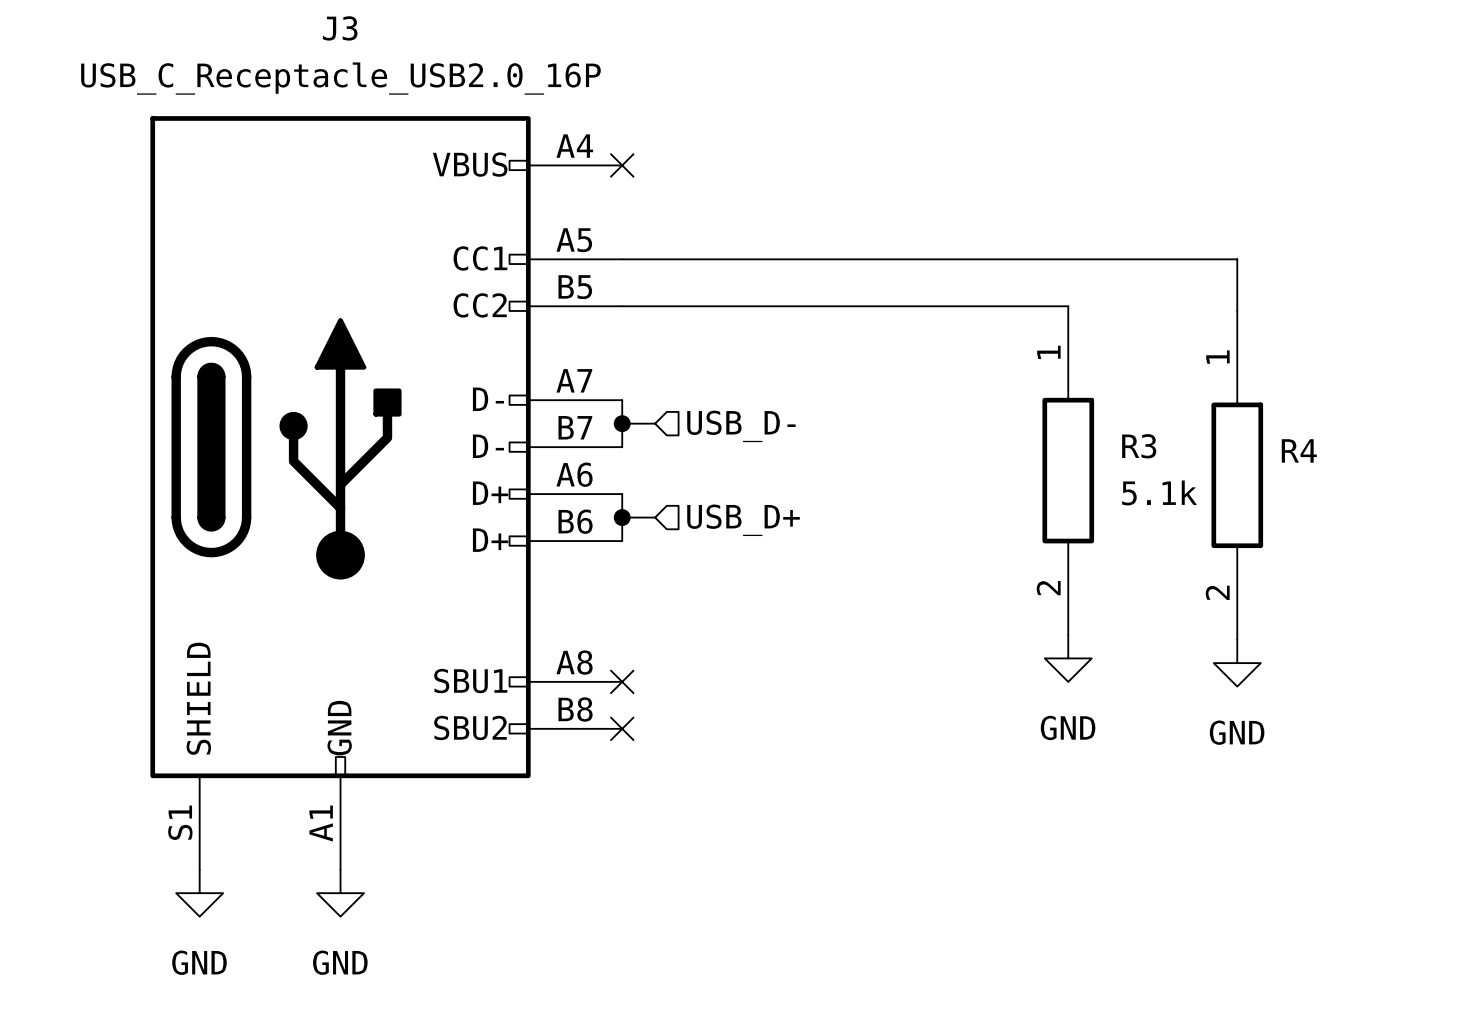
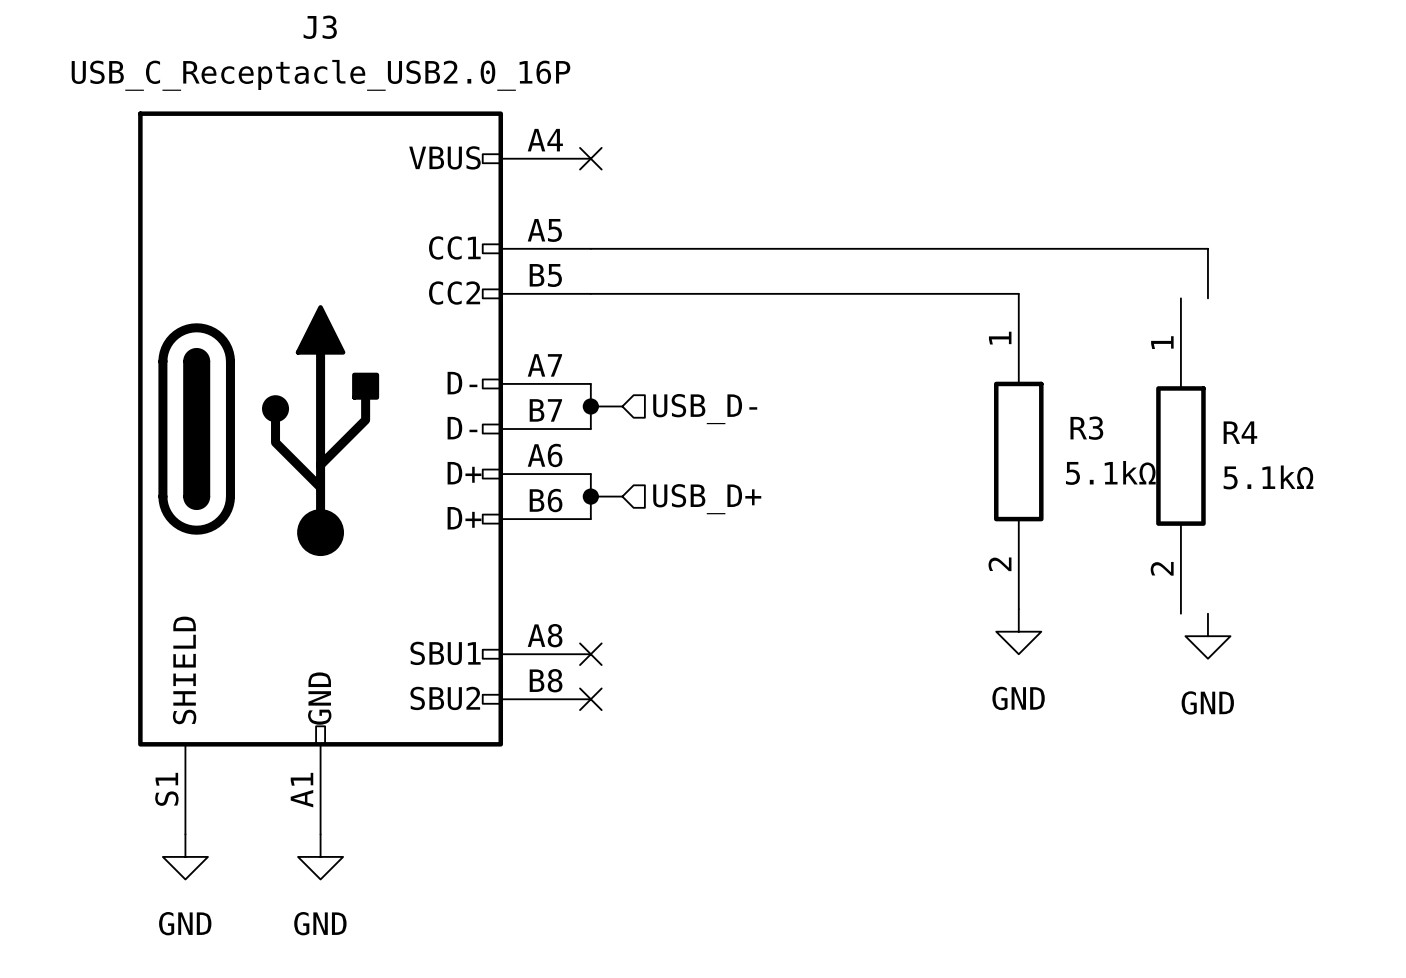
wire: (1237, 259) (1237, 310) -> (1180, 248) (1207, 248) (1207, 298)
R3 value: 5.1k (1159, 492) -> 5.1kΩ (1110, 472)
R4 value: none -> 5.1kΩ (1268, 477)
power symbol position: GND (1237, 663) -> GND (1207, 636)

